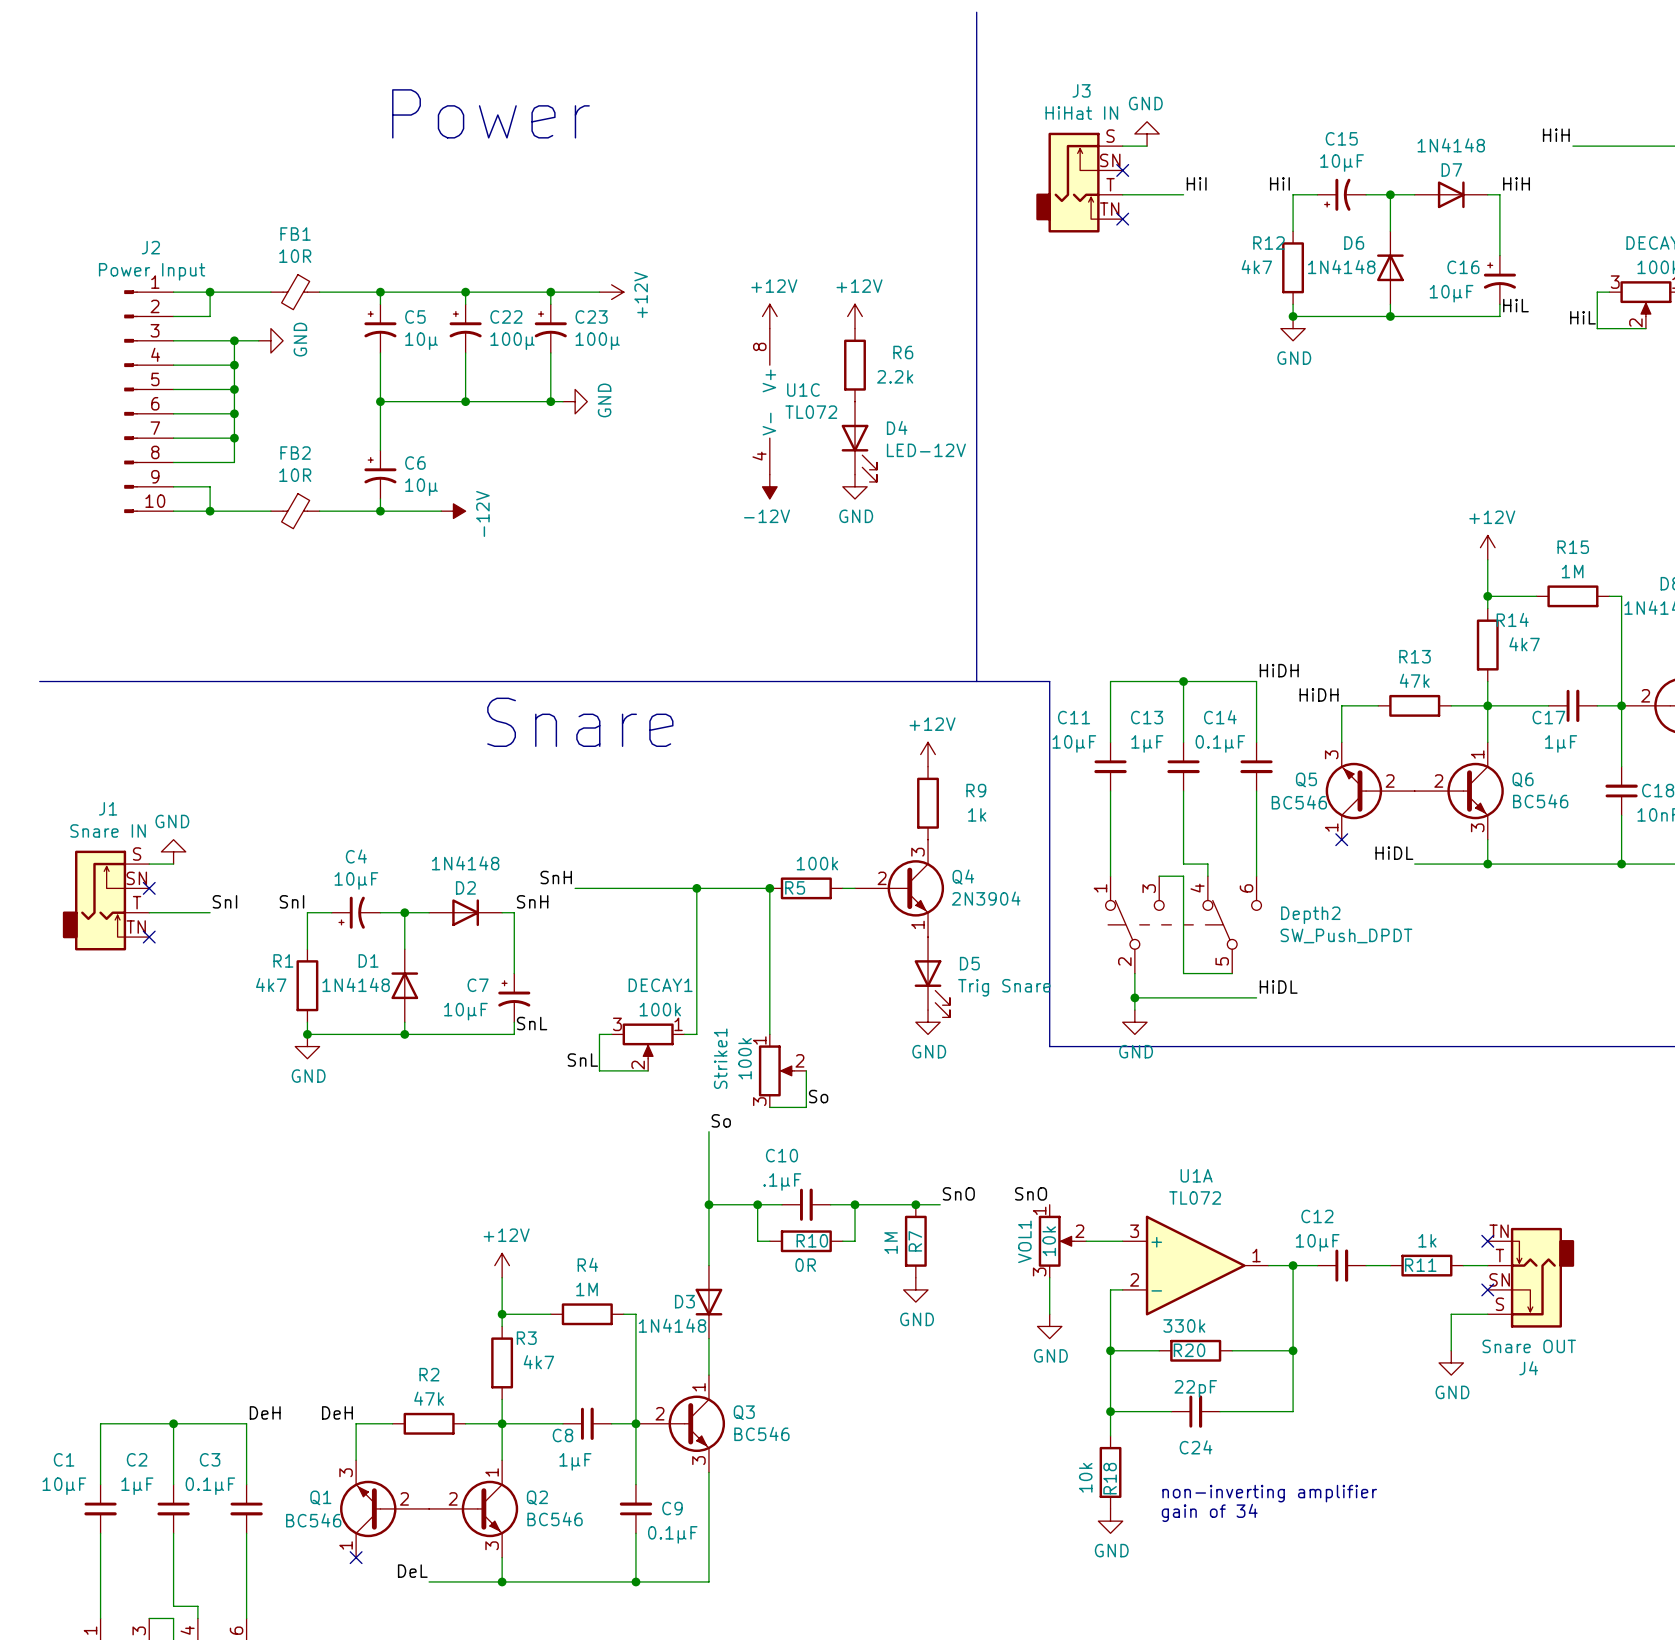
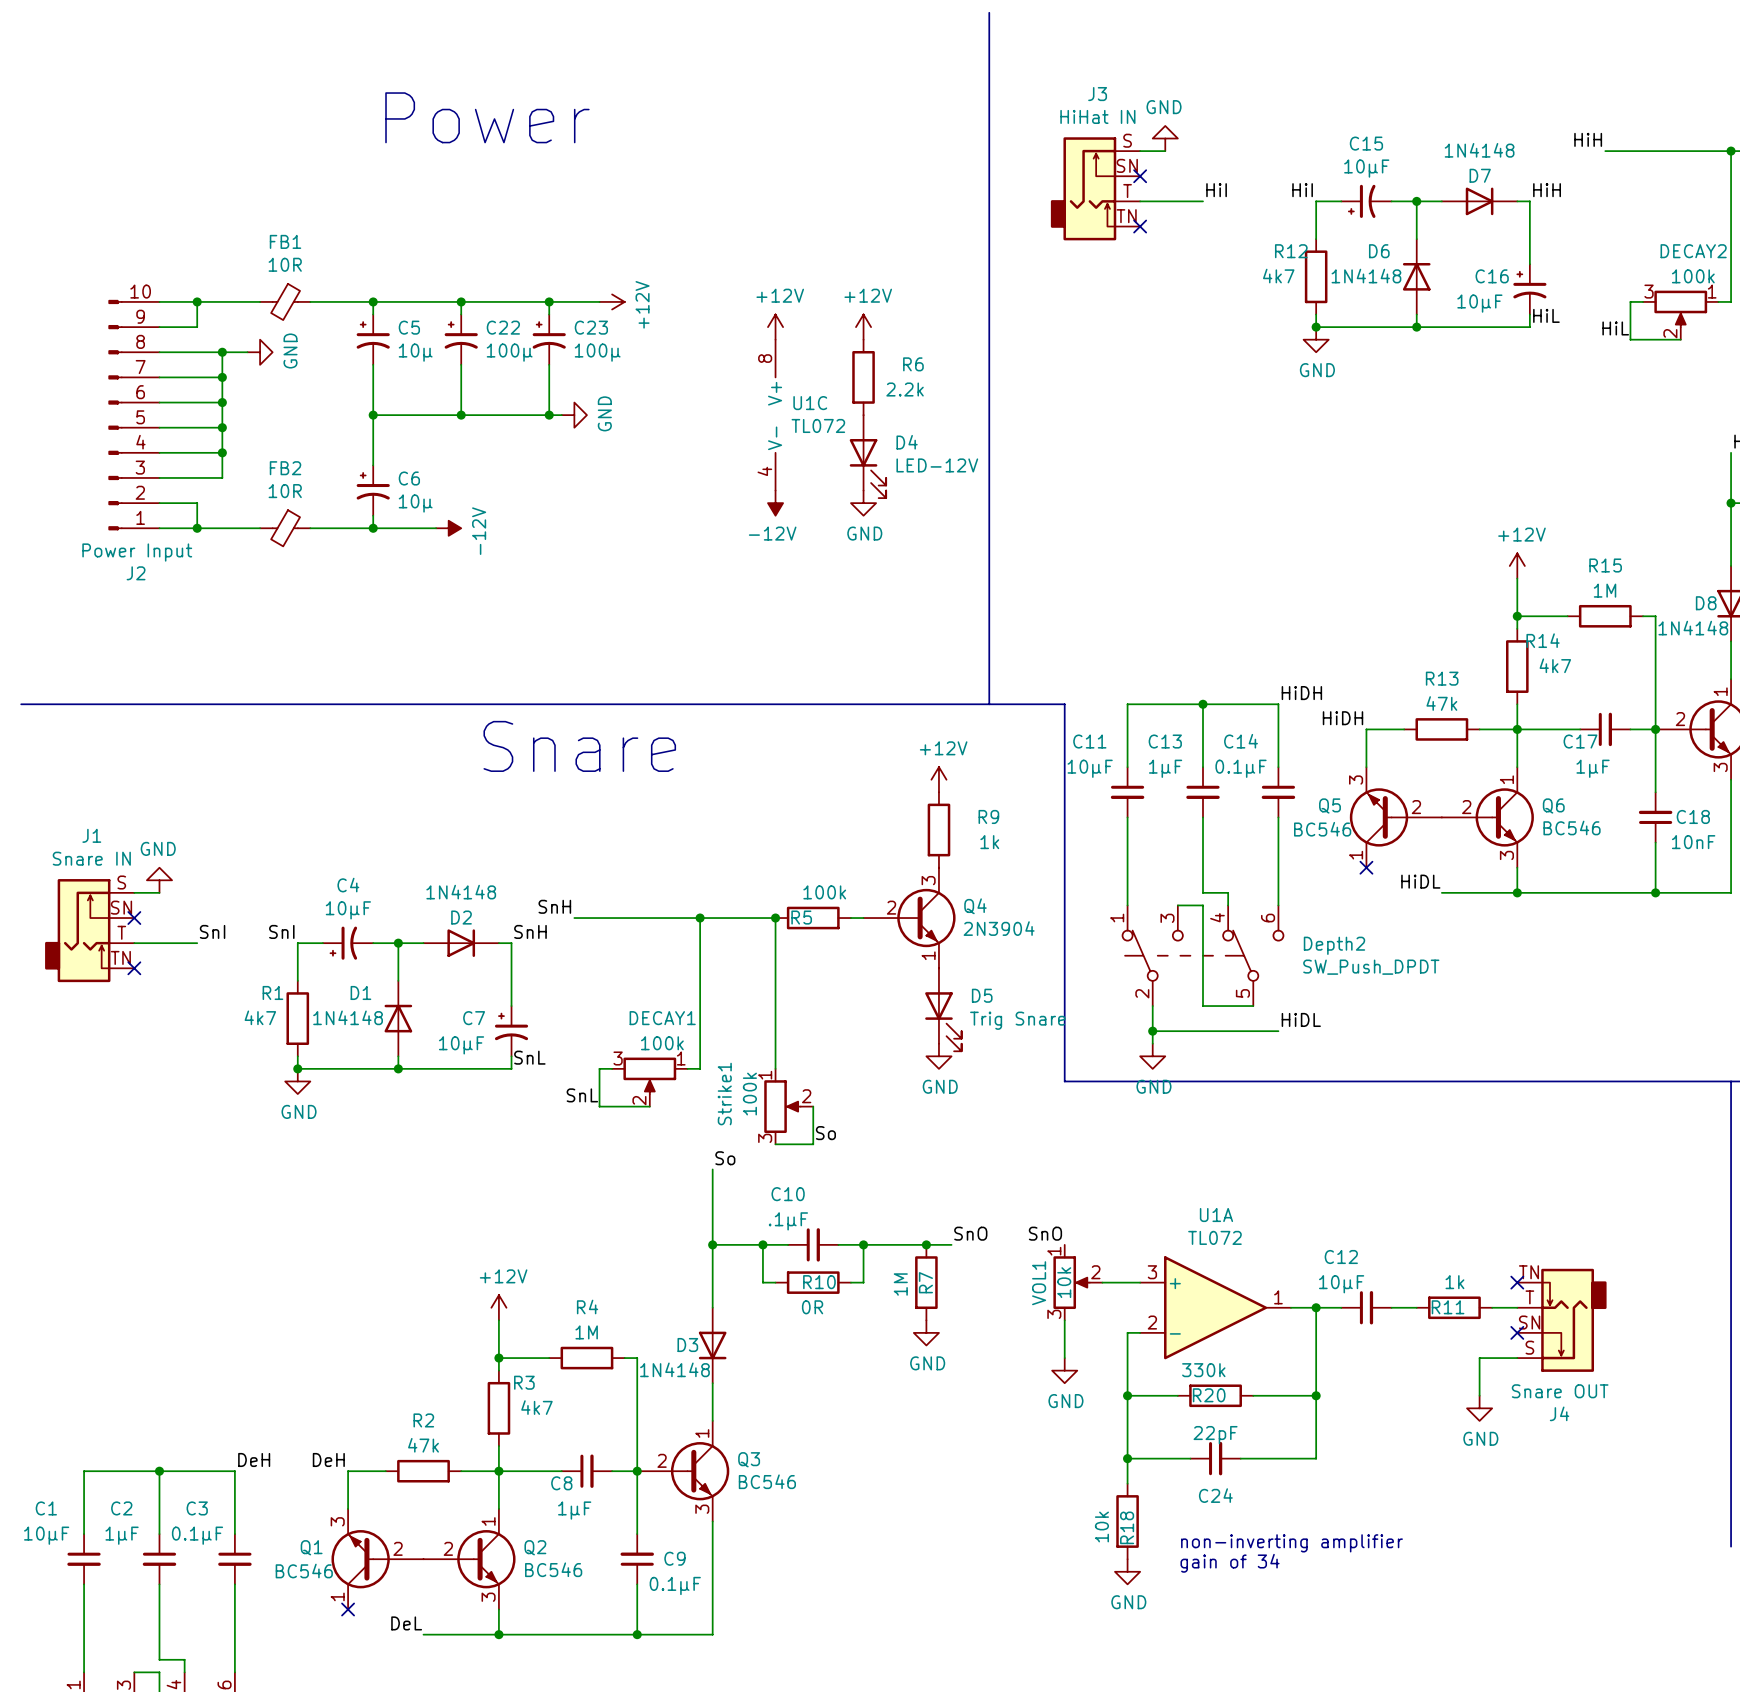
J2 flip: as is (130, 401) -> up-down (115, 415)

